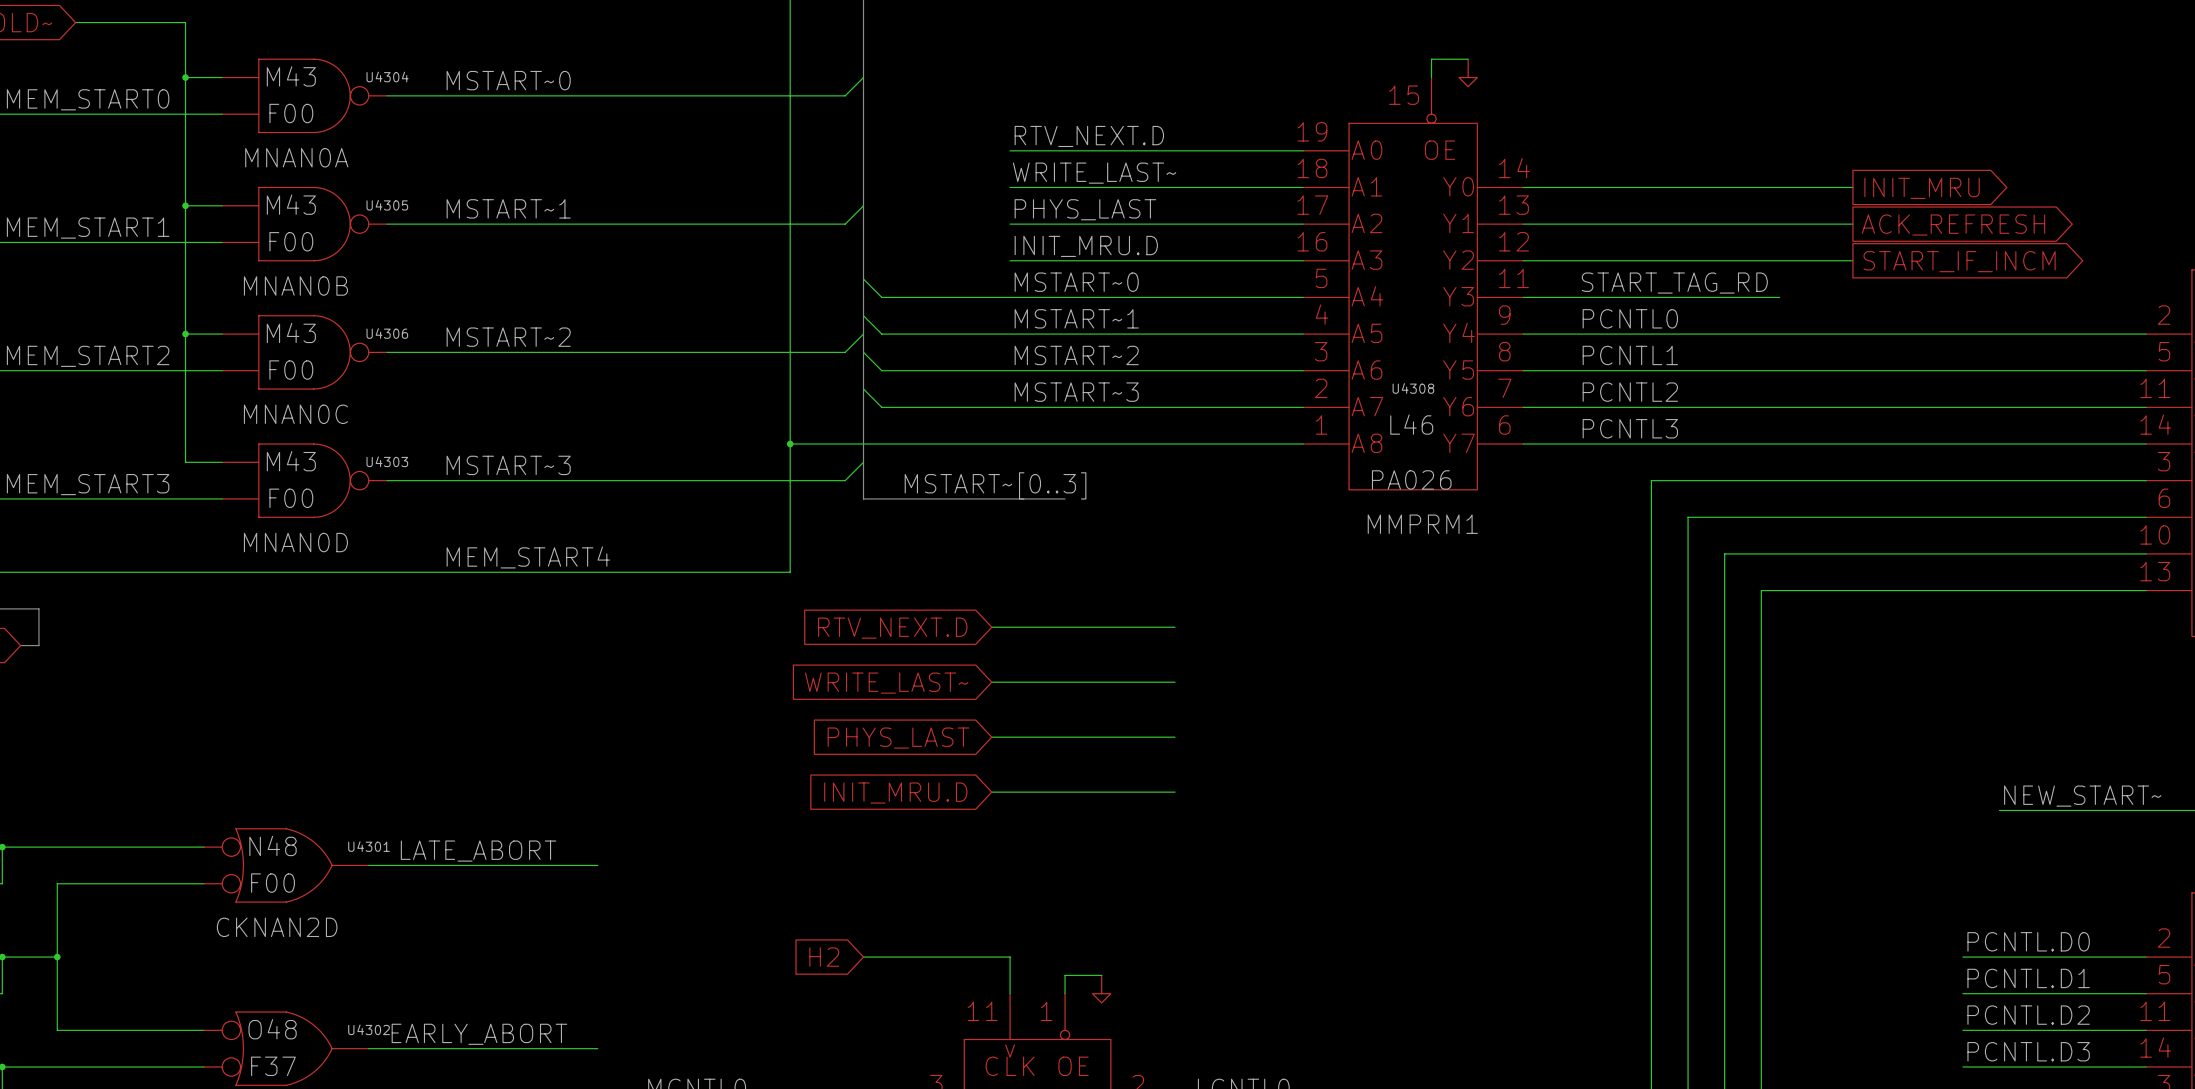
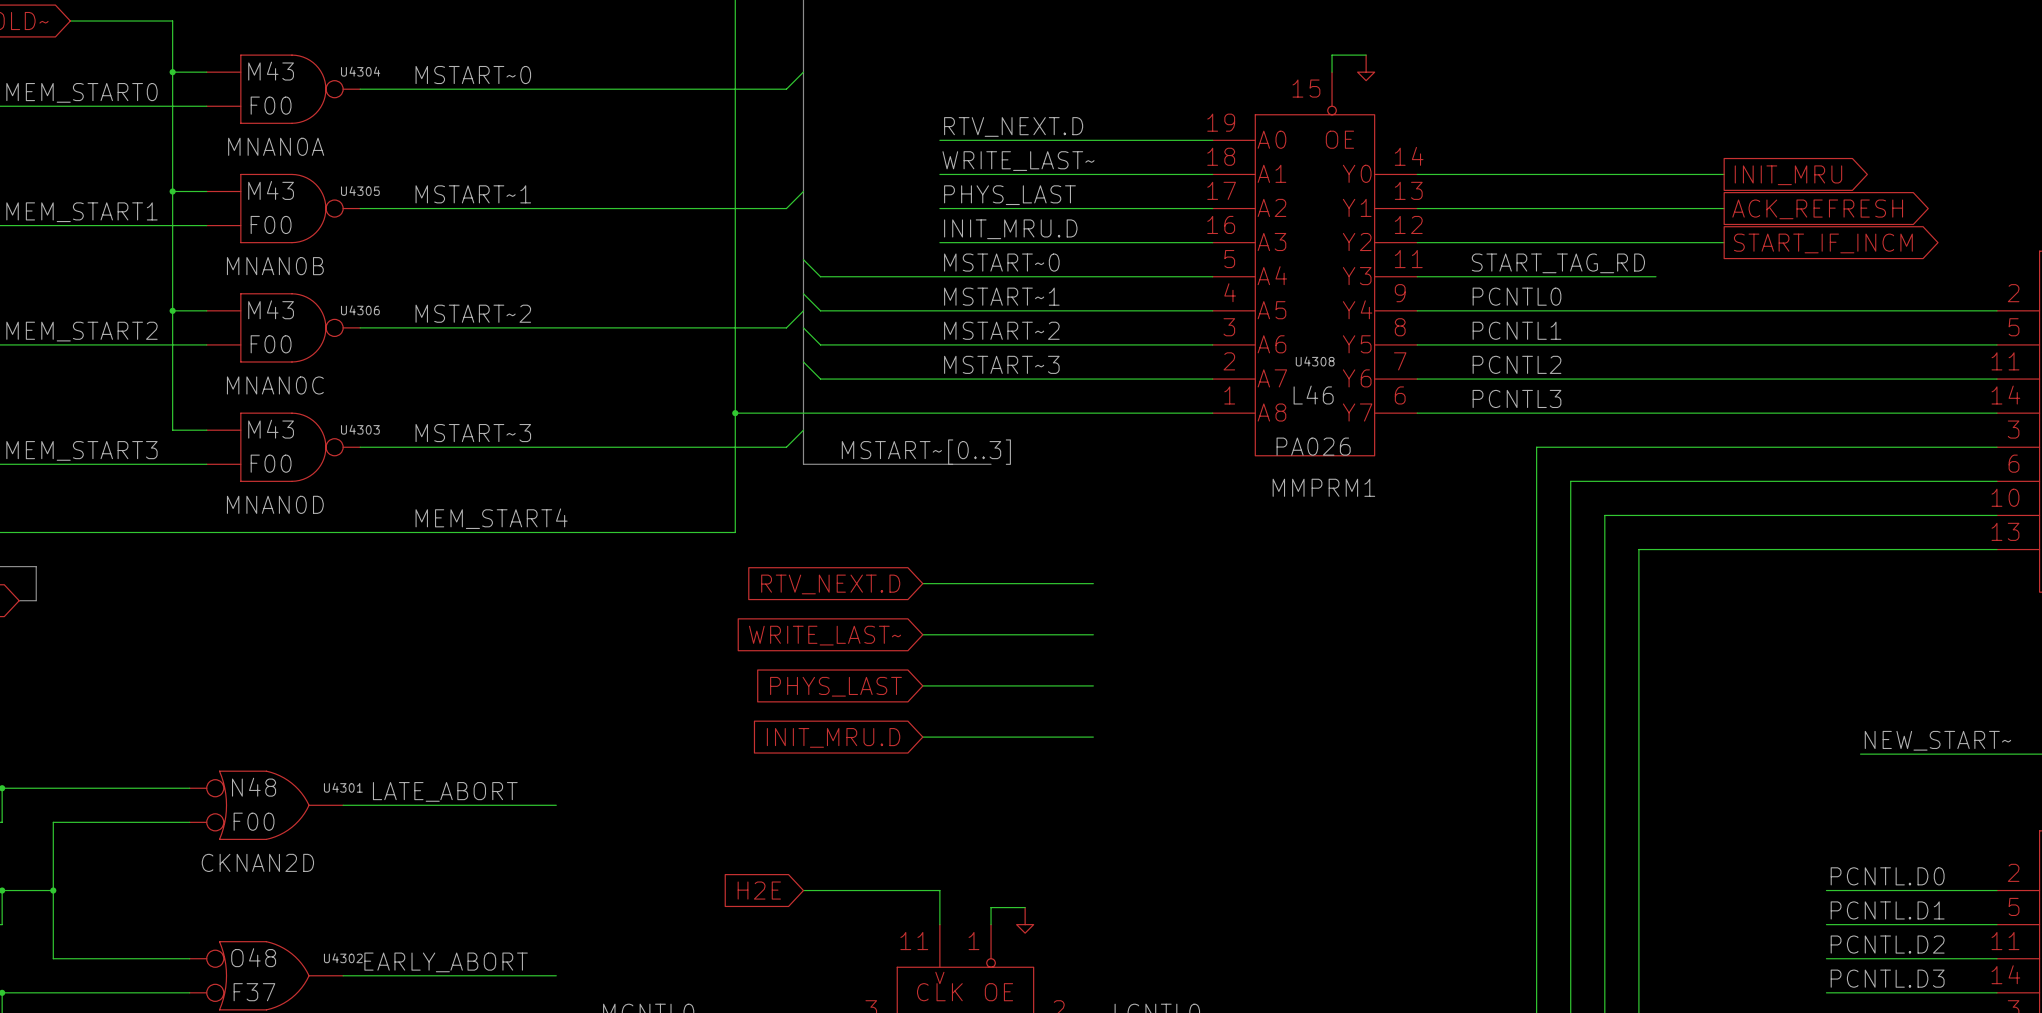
global label: H2 (824, 957) -> H2E (759, 890)

